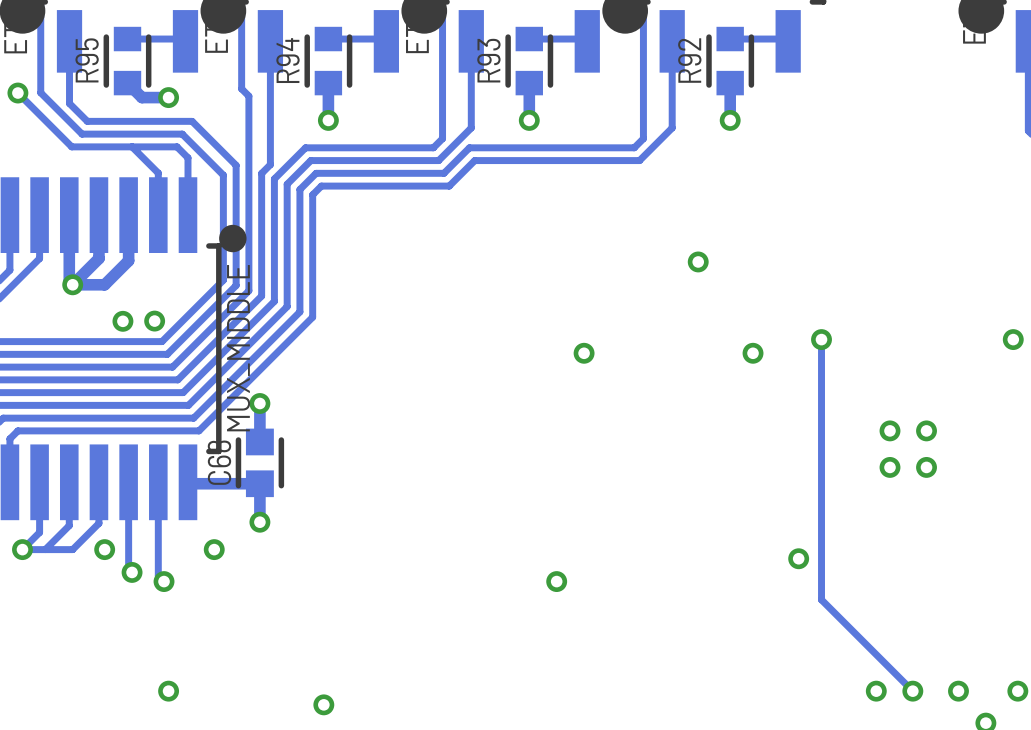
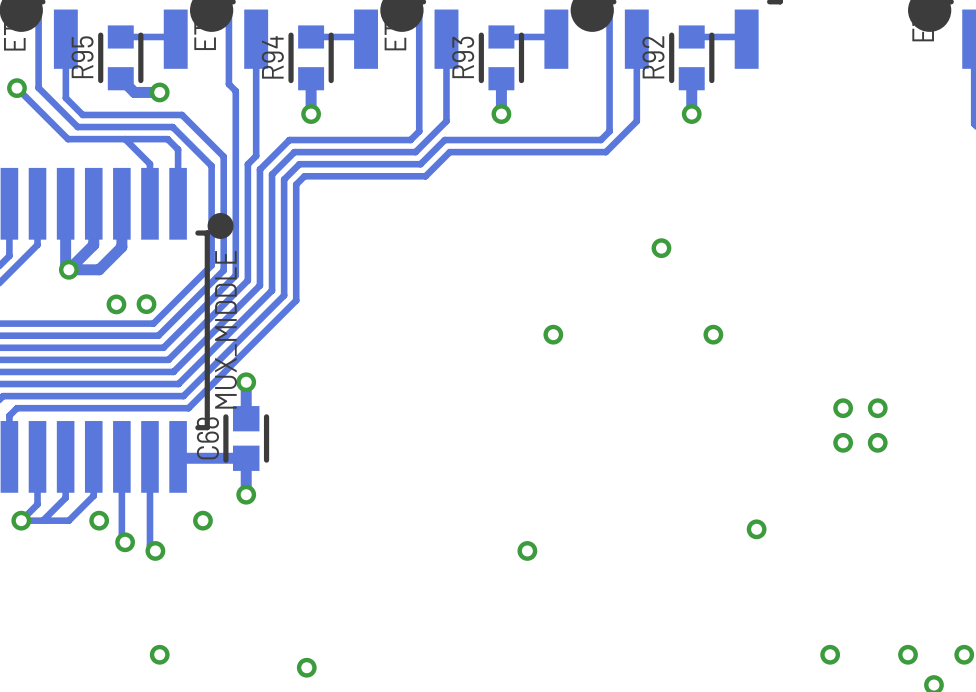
track: (821, 339) (821, 599) (912, 691) -> none
via: (821, 339) -> none
via: (1013, 339) -> none
via: (912, 691) -> none

